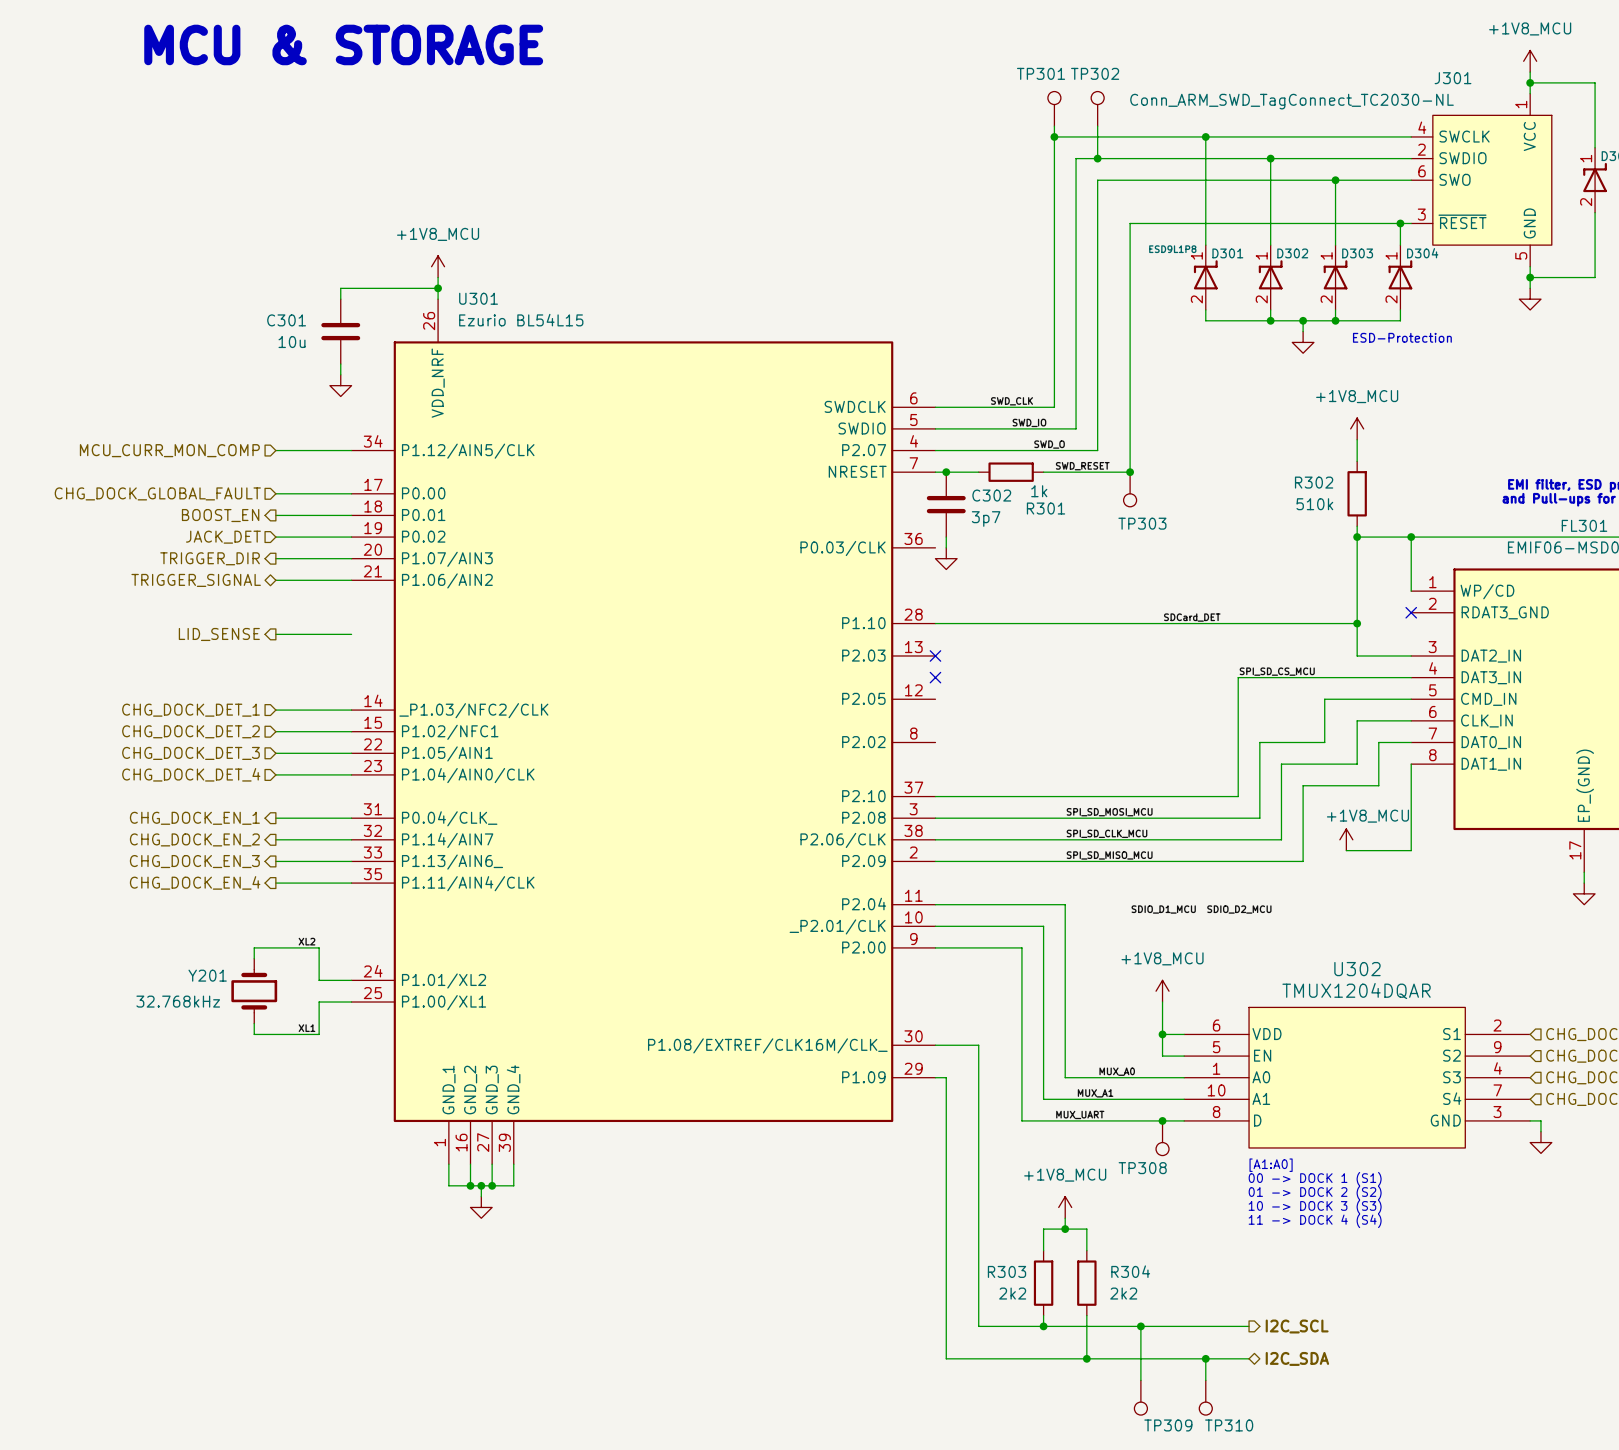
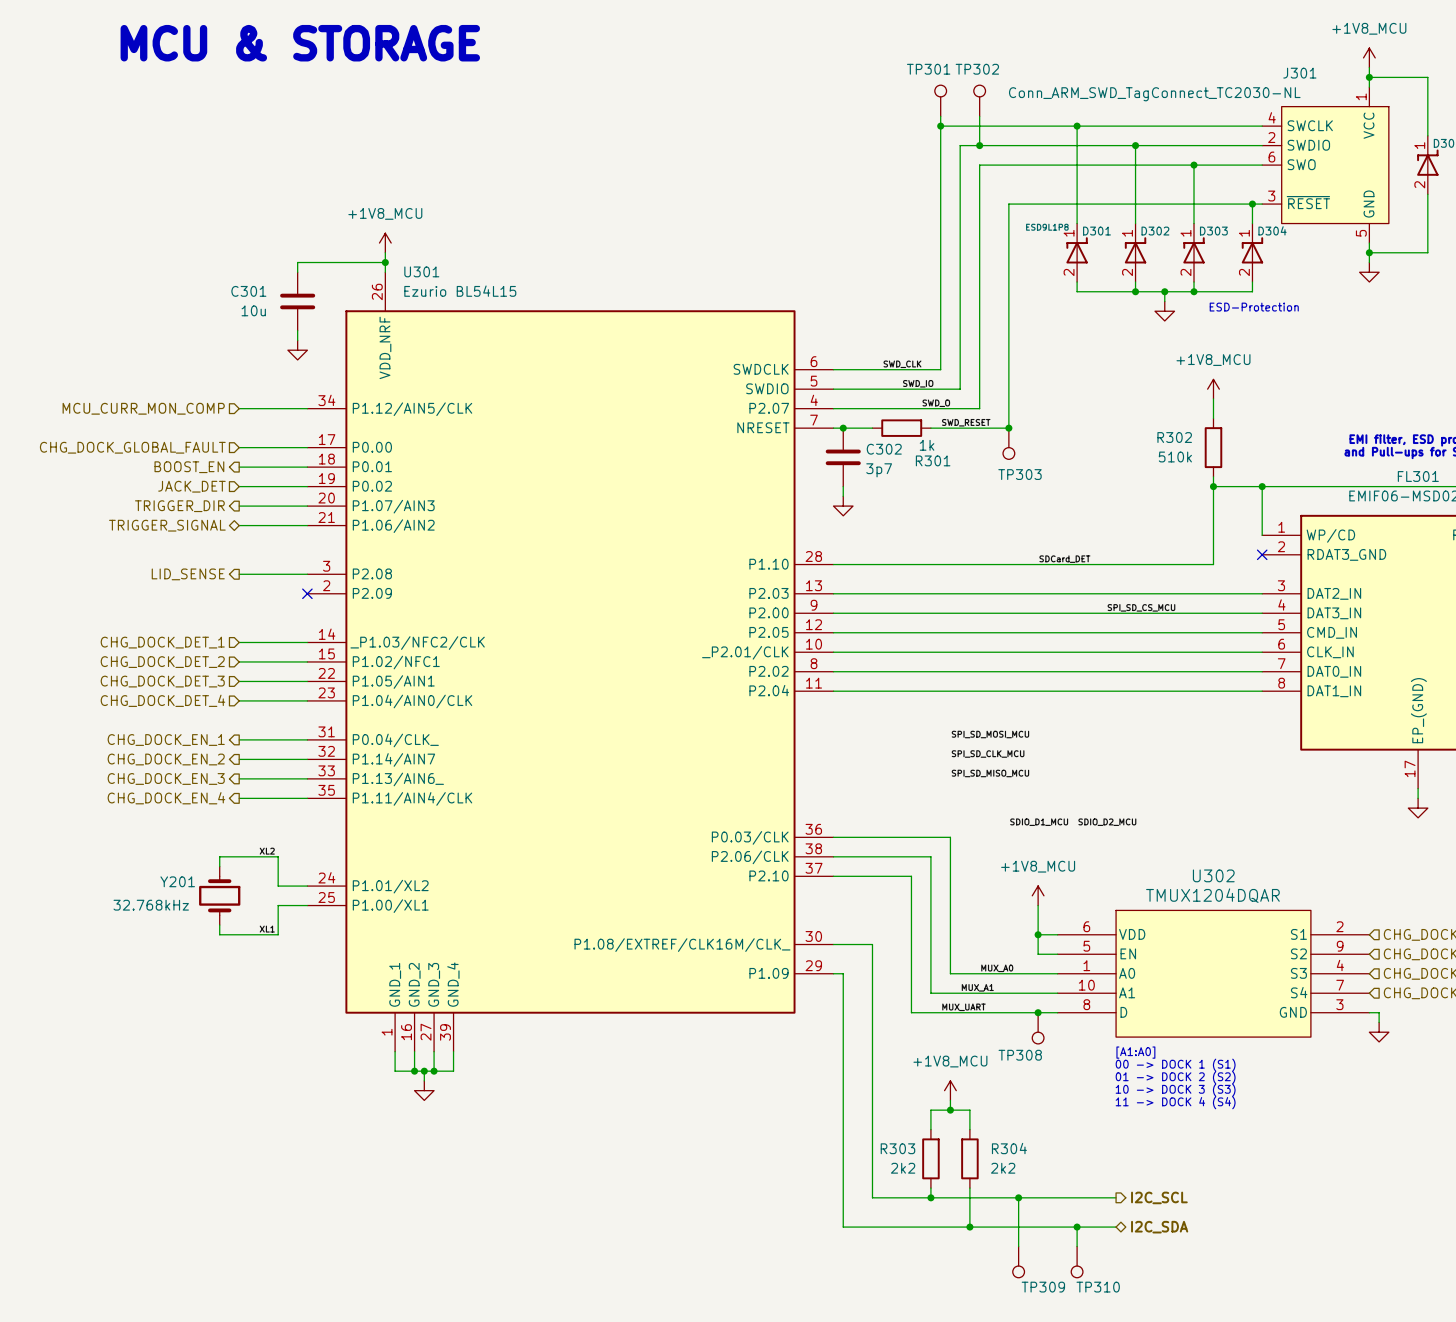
U301 symbol: [351, 299, 936, 1165] -> [307, 272, 834, 1052]
wire: (1357, 623) (1357, 655) -> (833, 593) (1213, 593)
junction: (1357, 623) -> none
no-connect mark: none -> (307, 593)
no-connect mark: (935, 655) -> none
no-connect mark: (935, 677) -> none
wire: (1238, 677) (1238, 796) (935, 796) -> (1106, 613) (833, 613)
wire: none -> (833, 632) (1184, 632)
wire: (1324, 699) (1324, 742) -> (1232, 671) (1184, 671)
wire: none -> (833, 652) (1213, 652)
wire: (1357, 720) (1357, 764) -> (1262, 691) (1213, 691)
wire: (1259, 742) (1259, 818) (935, 818) -> (1125, 671) (833, 671)
wire: (1378, 742) (1378, 785) (1303, 785) (1303, 861) (935, 861) -> none
wire: (1281, 764) (1281, 839) (935, 839) -> (1145, 691) (833, 691)
wire: (1411, 764) (1411, 850) (1346, 850) -> none
power symbol: +1V8_MCU (1346, 839) -> none
wire: (935, 904) (1065, 904) (1065, 926) -> (930, 837) (950, 837)
wire: (1043, 926) (1043, 947) -> (911, 856) (930, 856)
wire: (1021, 947) (1021, 969) -> (833, 876) (911, 876)

